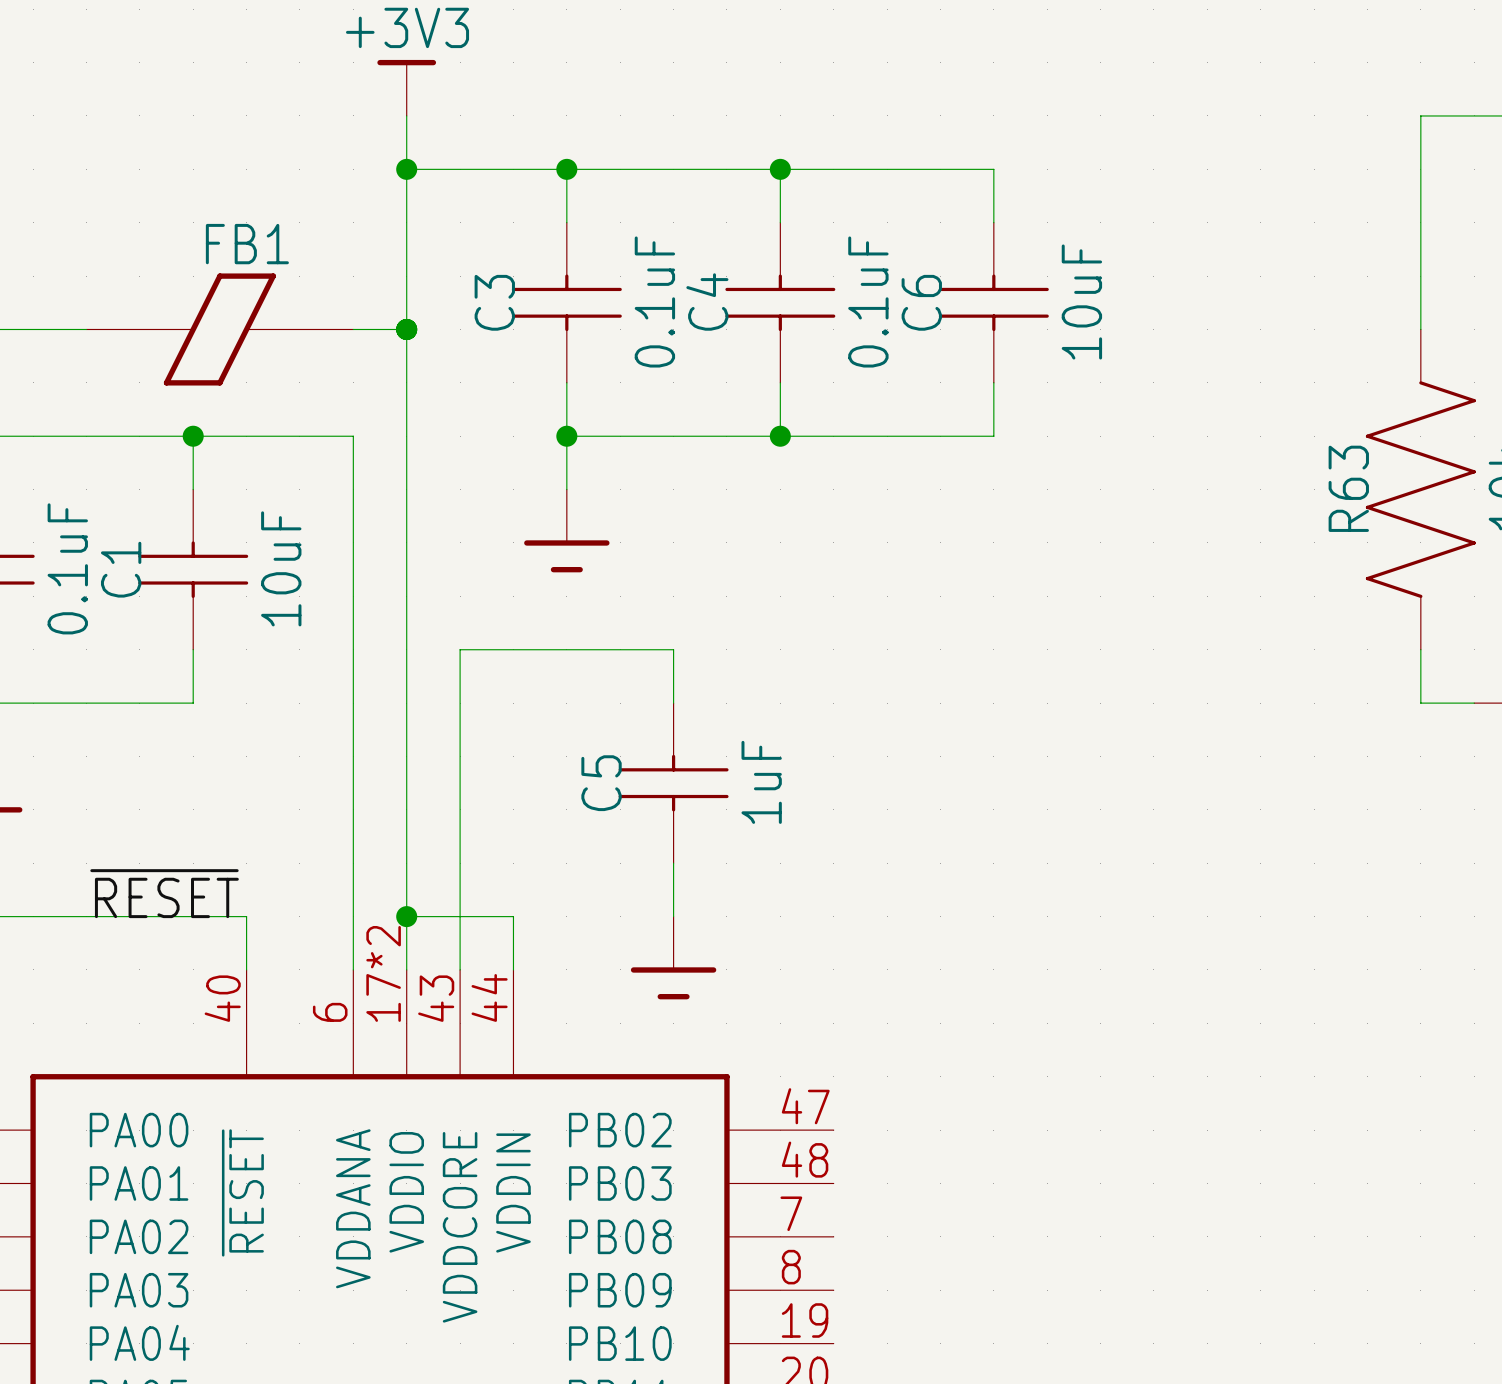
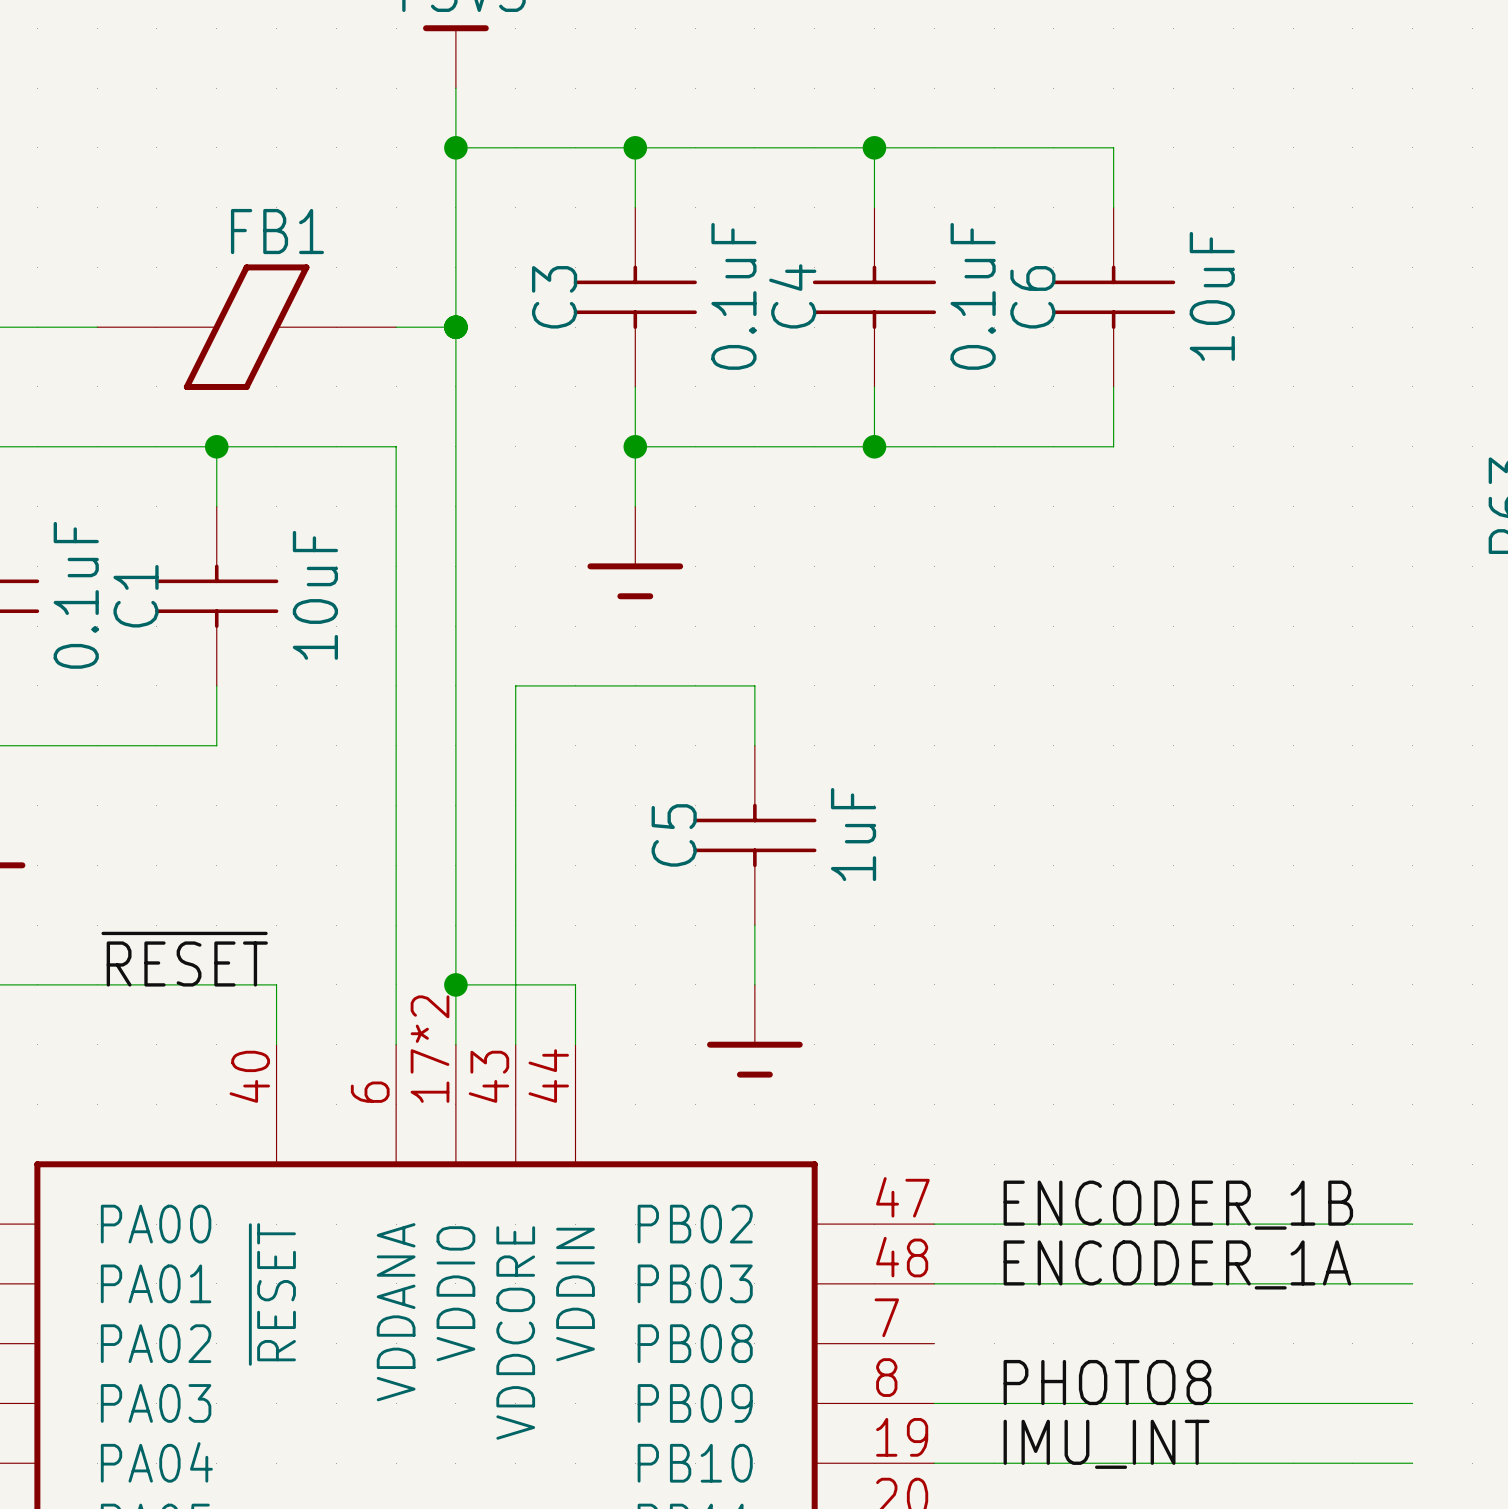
label: none -> ENCODER_1B (1178, 1205)
wire: none -> (934, 1224) (1412, 1224)
label: none -> ENCODER_1A (1177, 1264)
wire: none -> (934, 1283) (1412, 1283)
label: none -> PHOTO8 (1107, 1382)
wire: none -> (934, 1403) (1412, 1403)
label: none -> IMU_INT (1106, 1444)
wire: none -> (934, 1463) (1412, 1463)

